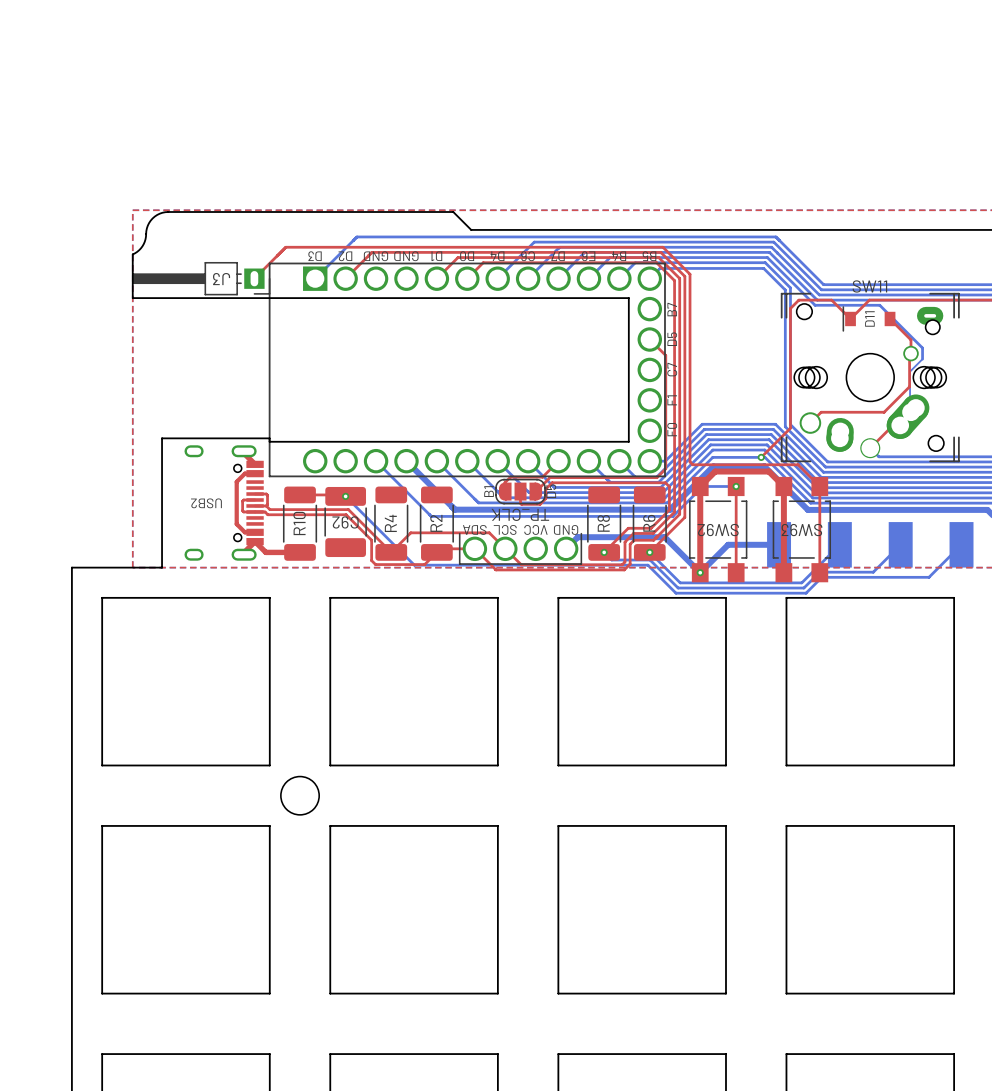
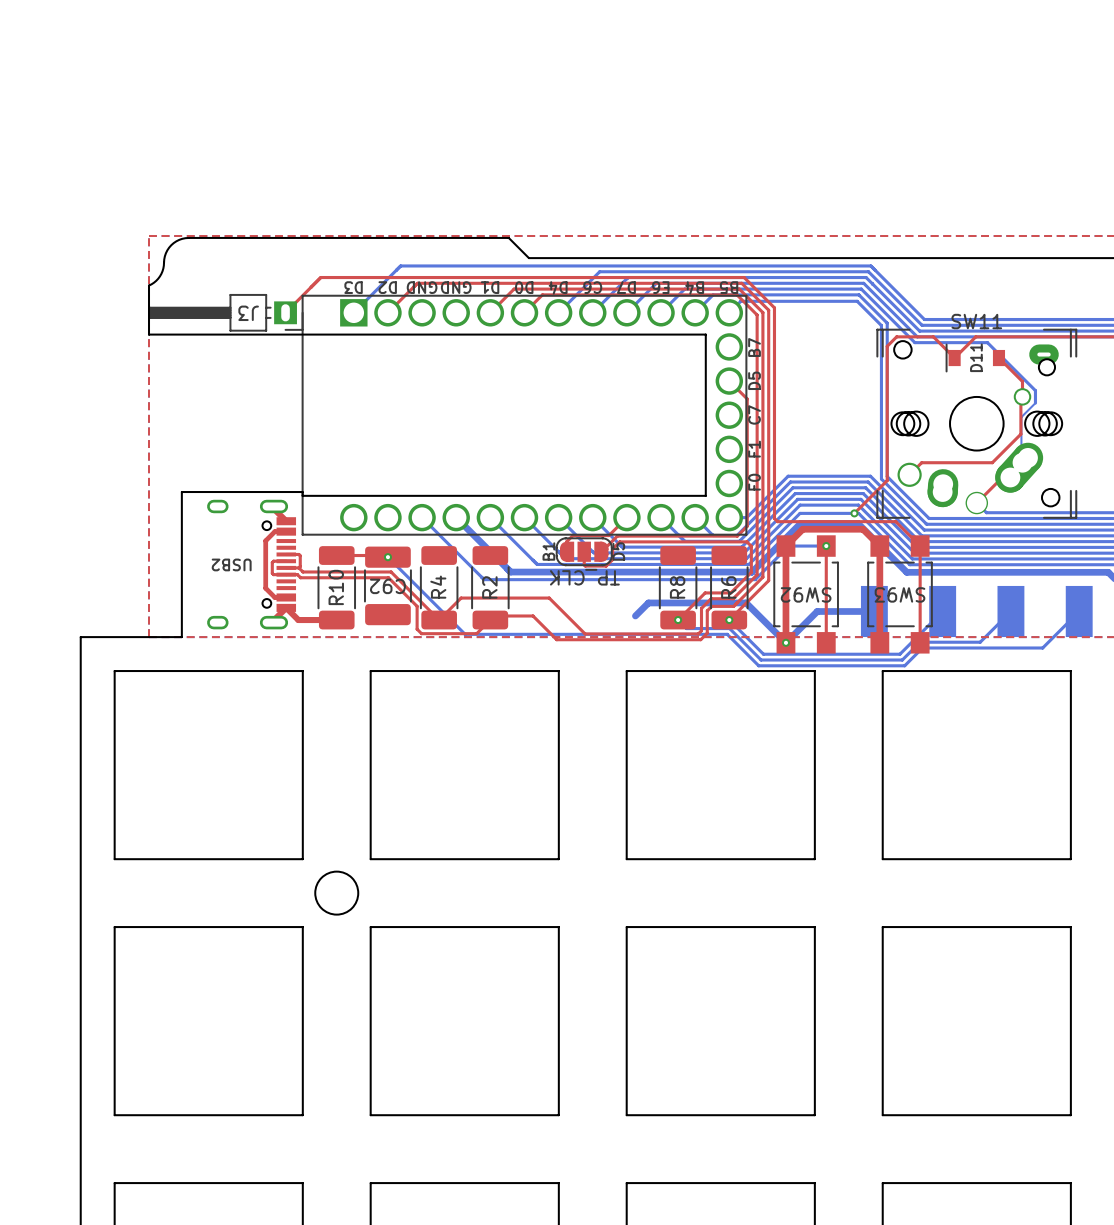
part: (520, 548) -> none

